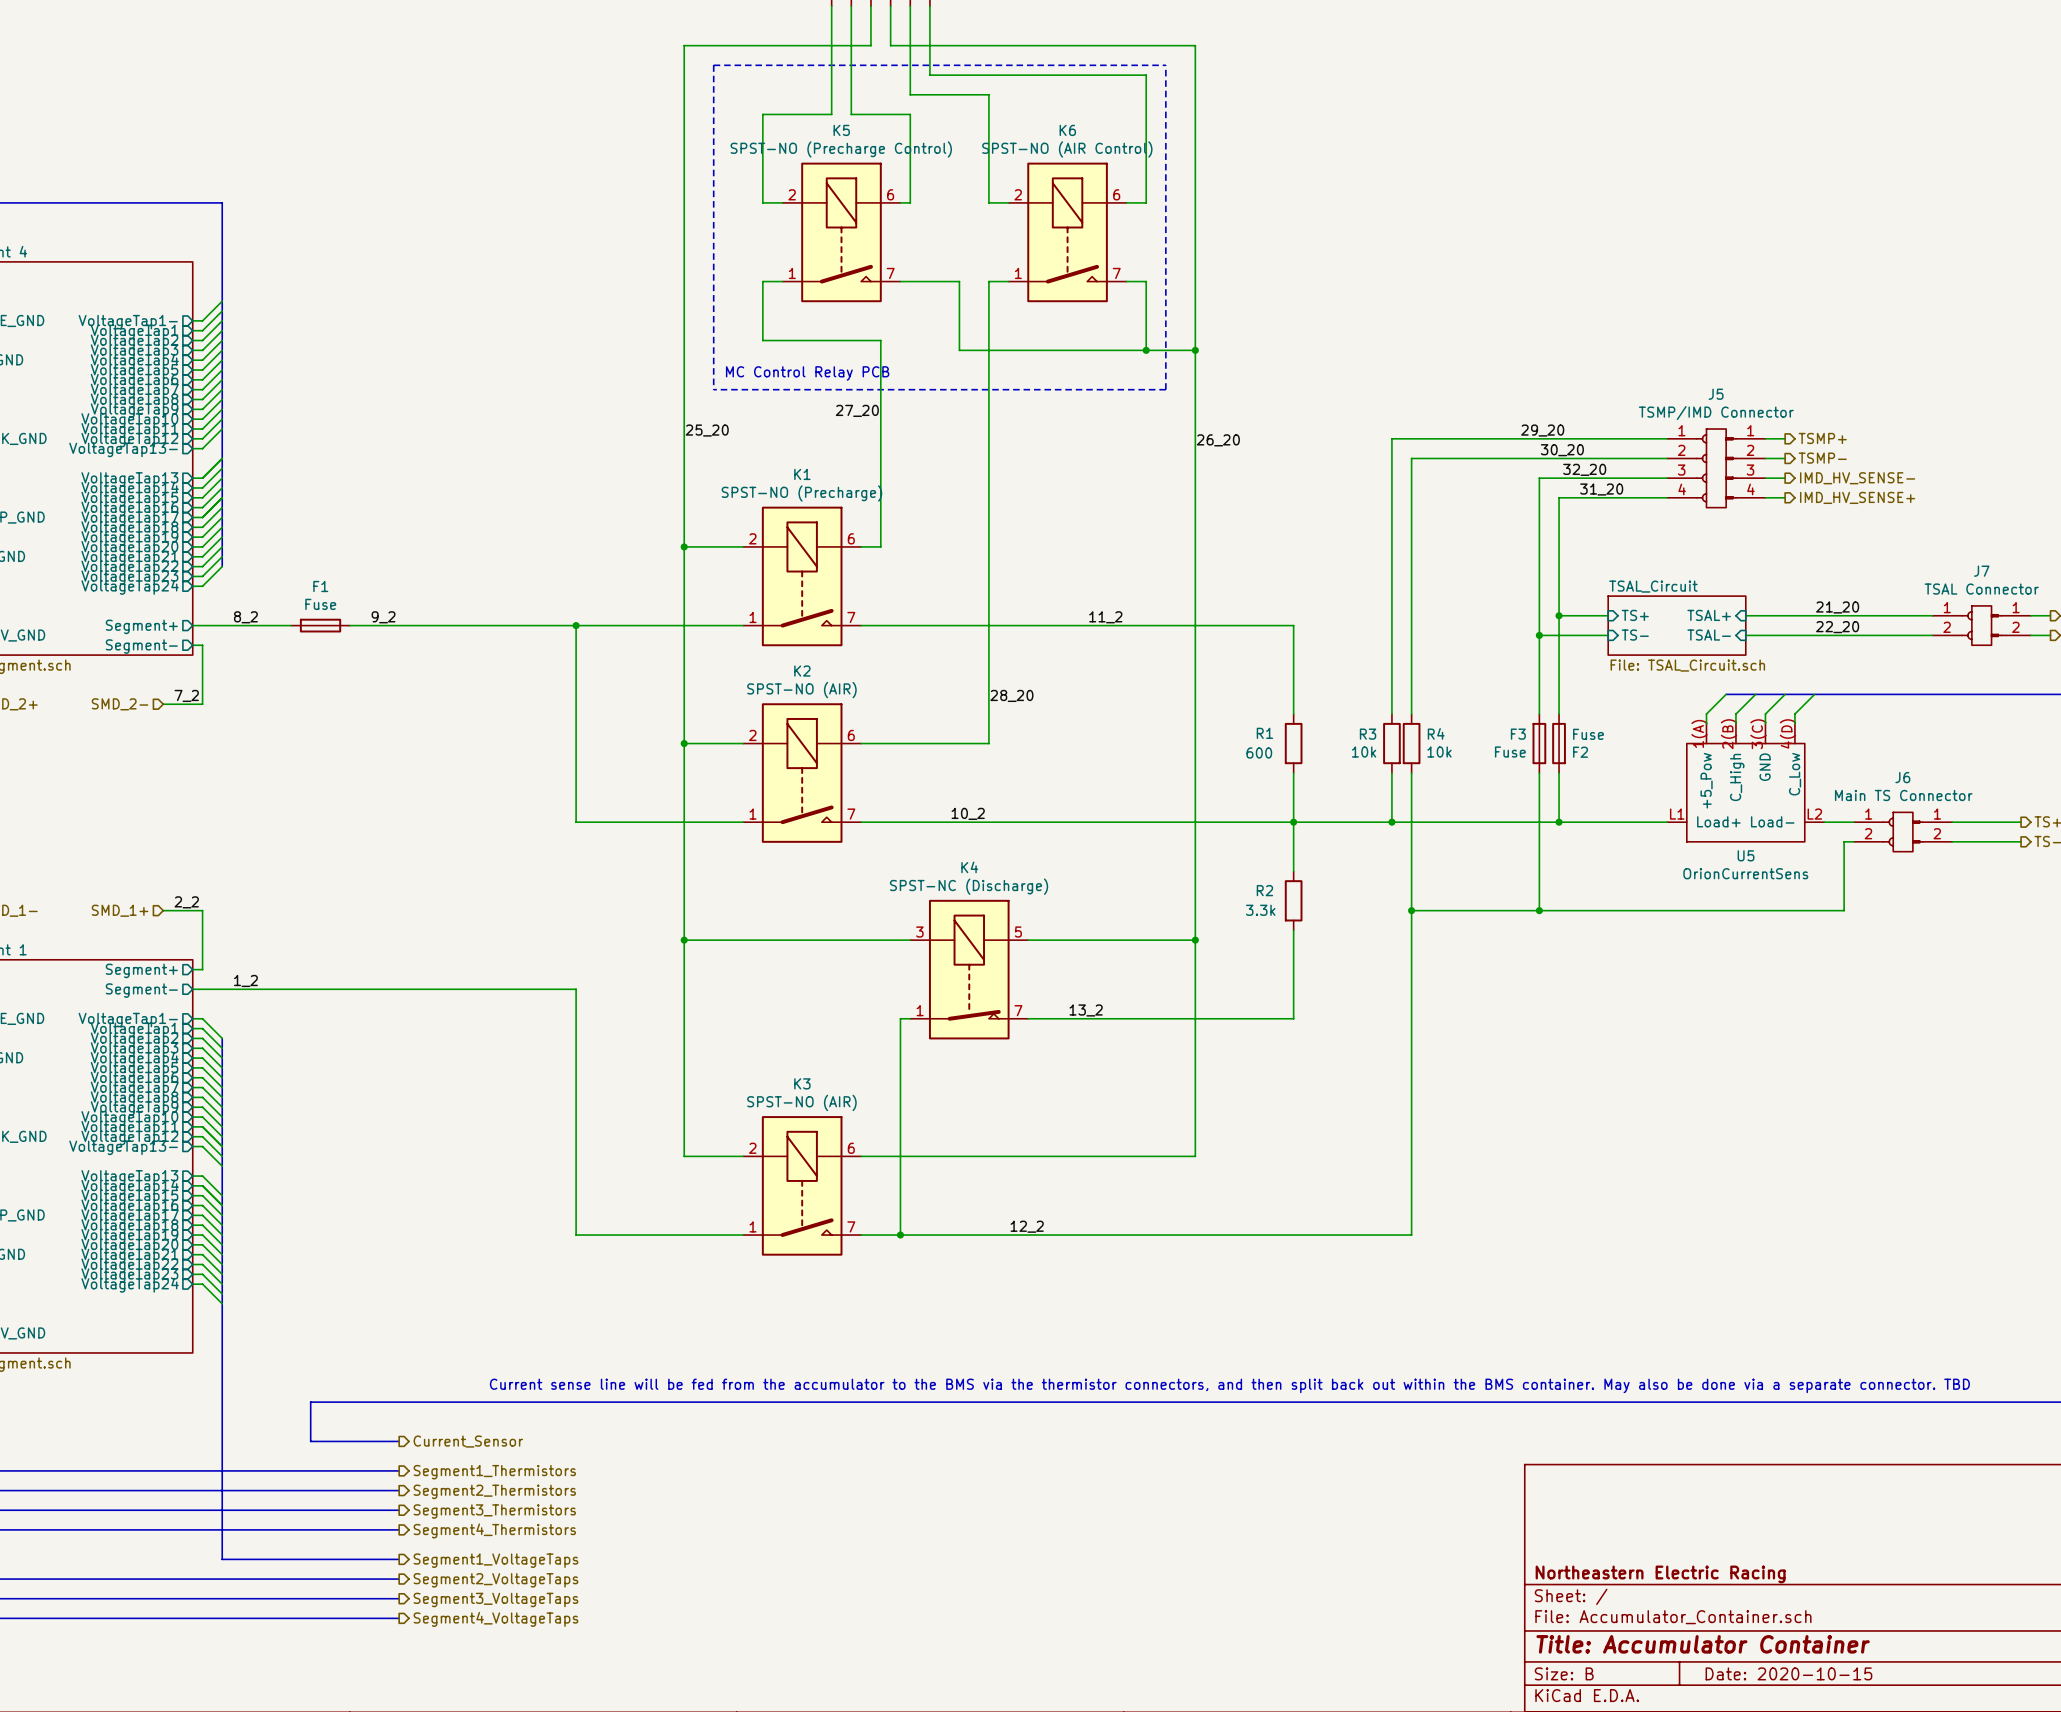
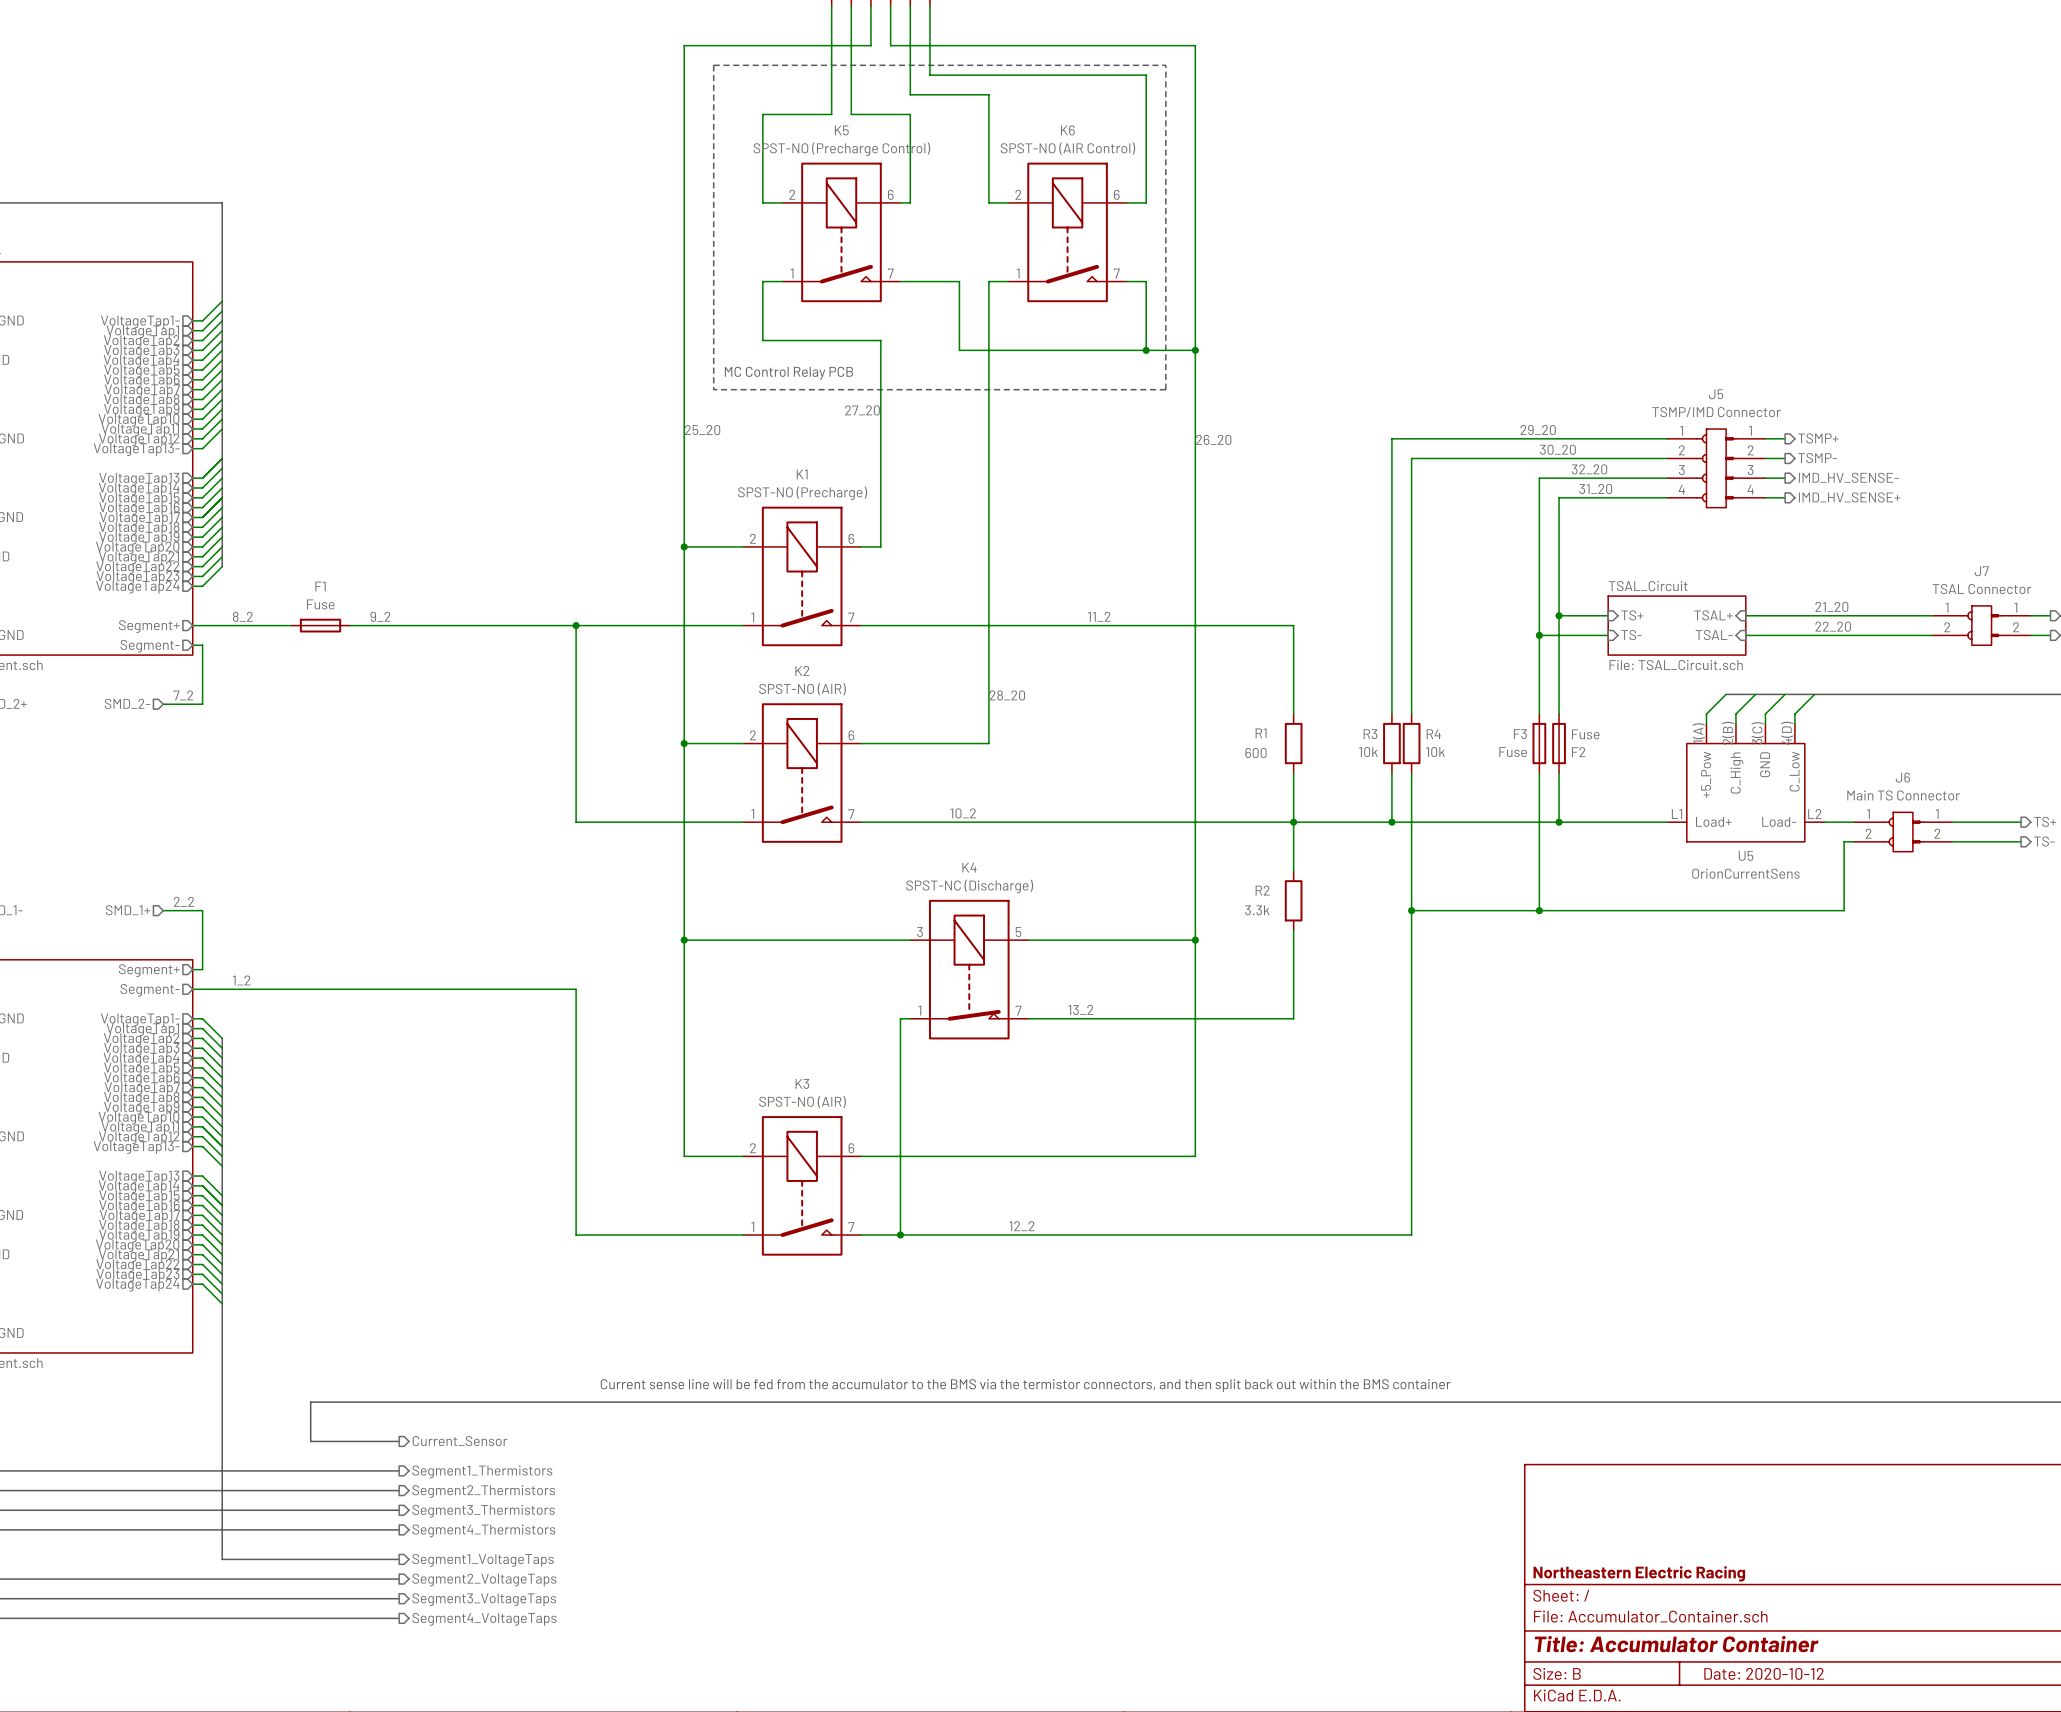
text: none -> Current sense line will be fed from the accumulator to the BMS via the termistor connectors, and then split back out within the BMS container (1025, 1385)
text: Current sense line will be fed from the accumulator to the BMS via the thermistor connectors, and then split back out within the BMS container. May also be done via a separate connector. TBD (1229, 1385) -> none
title block: Date: 2020-10-15 (1788, 1673) -> Date: 2020-10-12 (1764, 1673)

